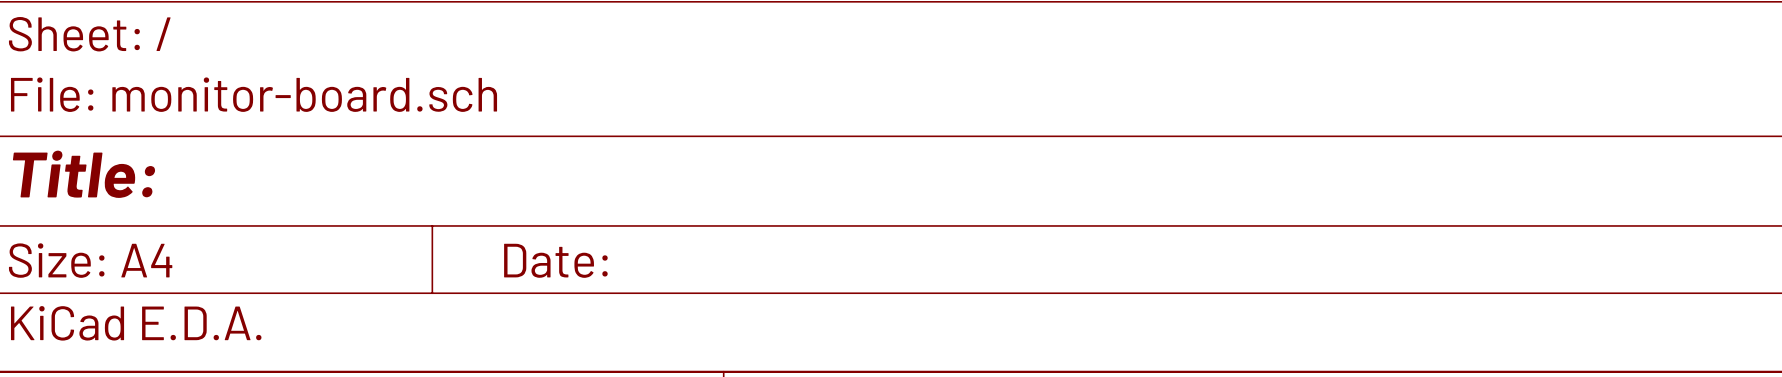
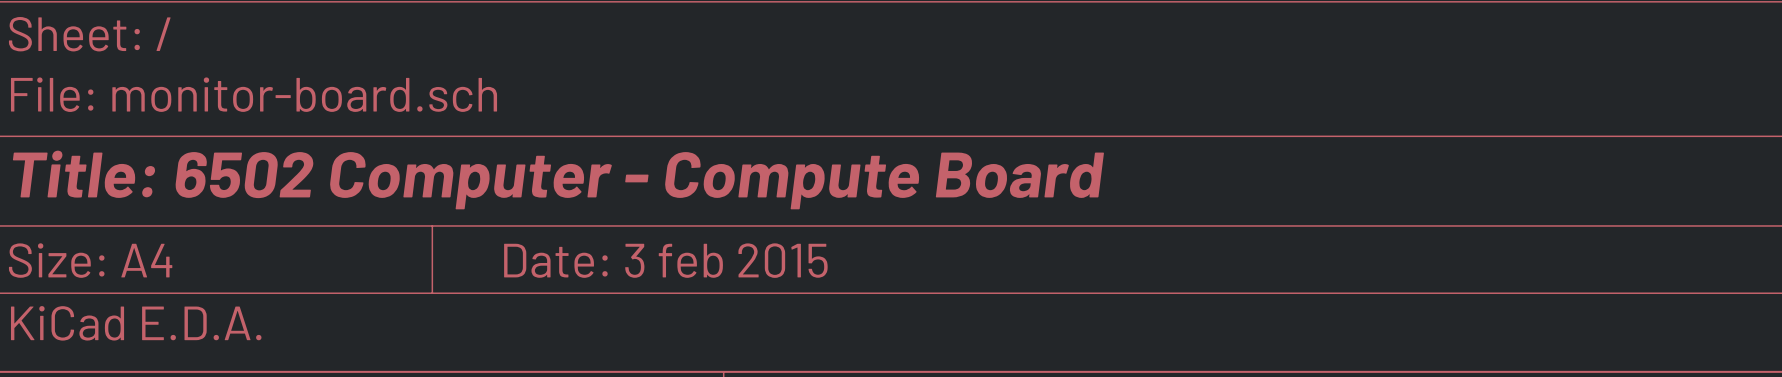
title block: Title: (84, 174) -> Title: 6502 Computer - Compute Board (558, 179)
title block: Date: (555, 260) -> Date: 3 feb 2015 (665, 260)

